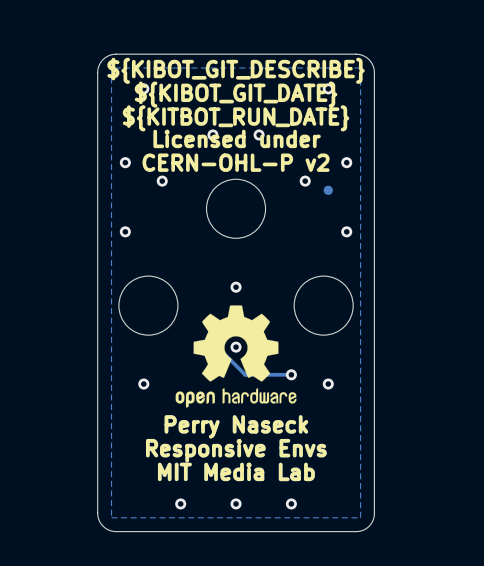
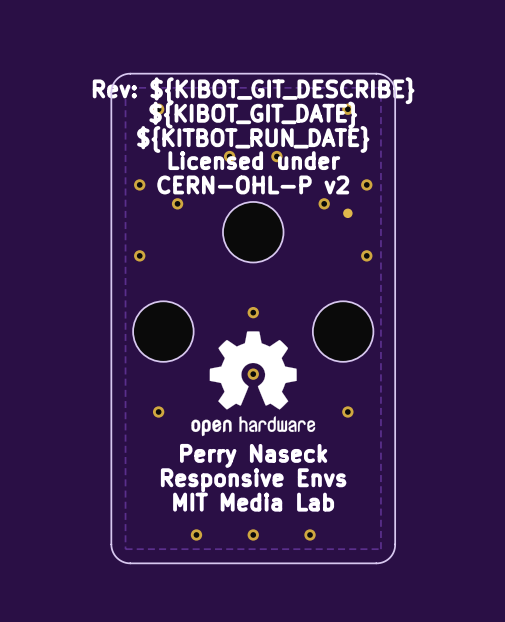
text: ${KIBOT_GIT_DESCRIBE} (236, 70) -> Rev: ${KIBOT_GIT_DESCRIBE} (253, 90)
track: (212, 342) (245, 374) (291, 374) -> none
via: (291, 374) -> none

